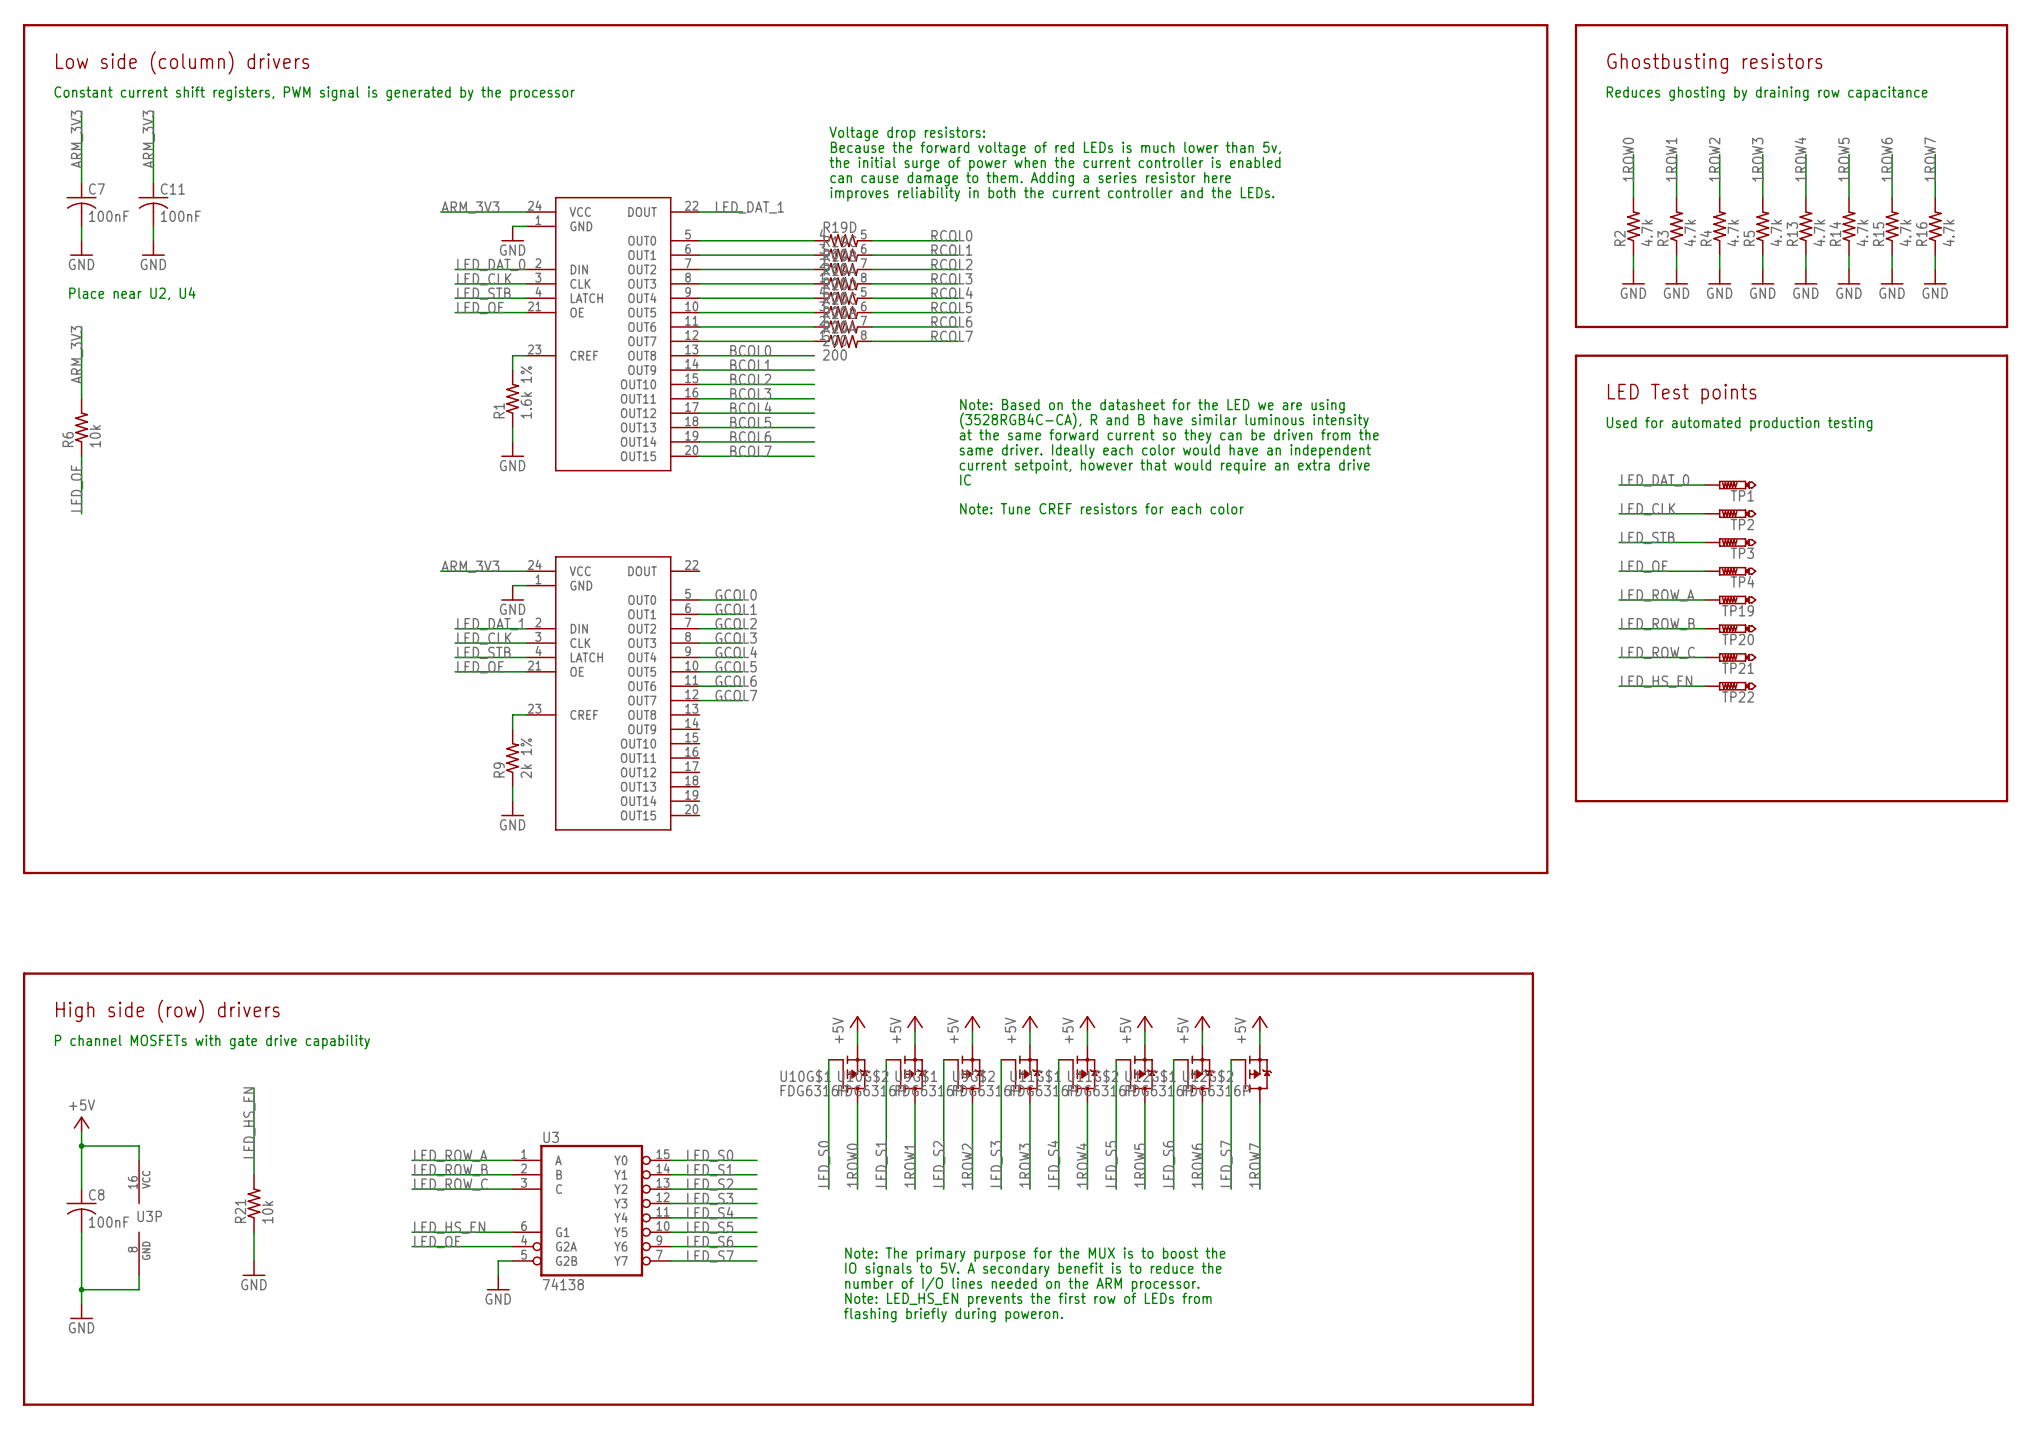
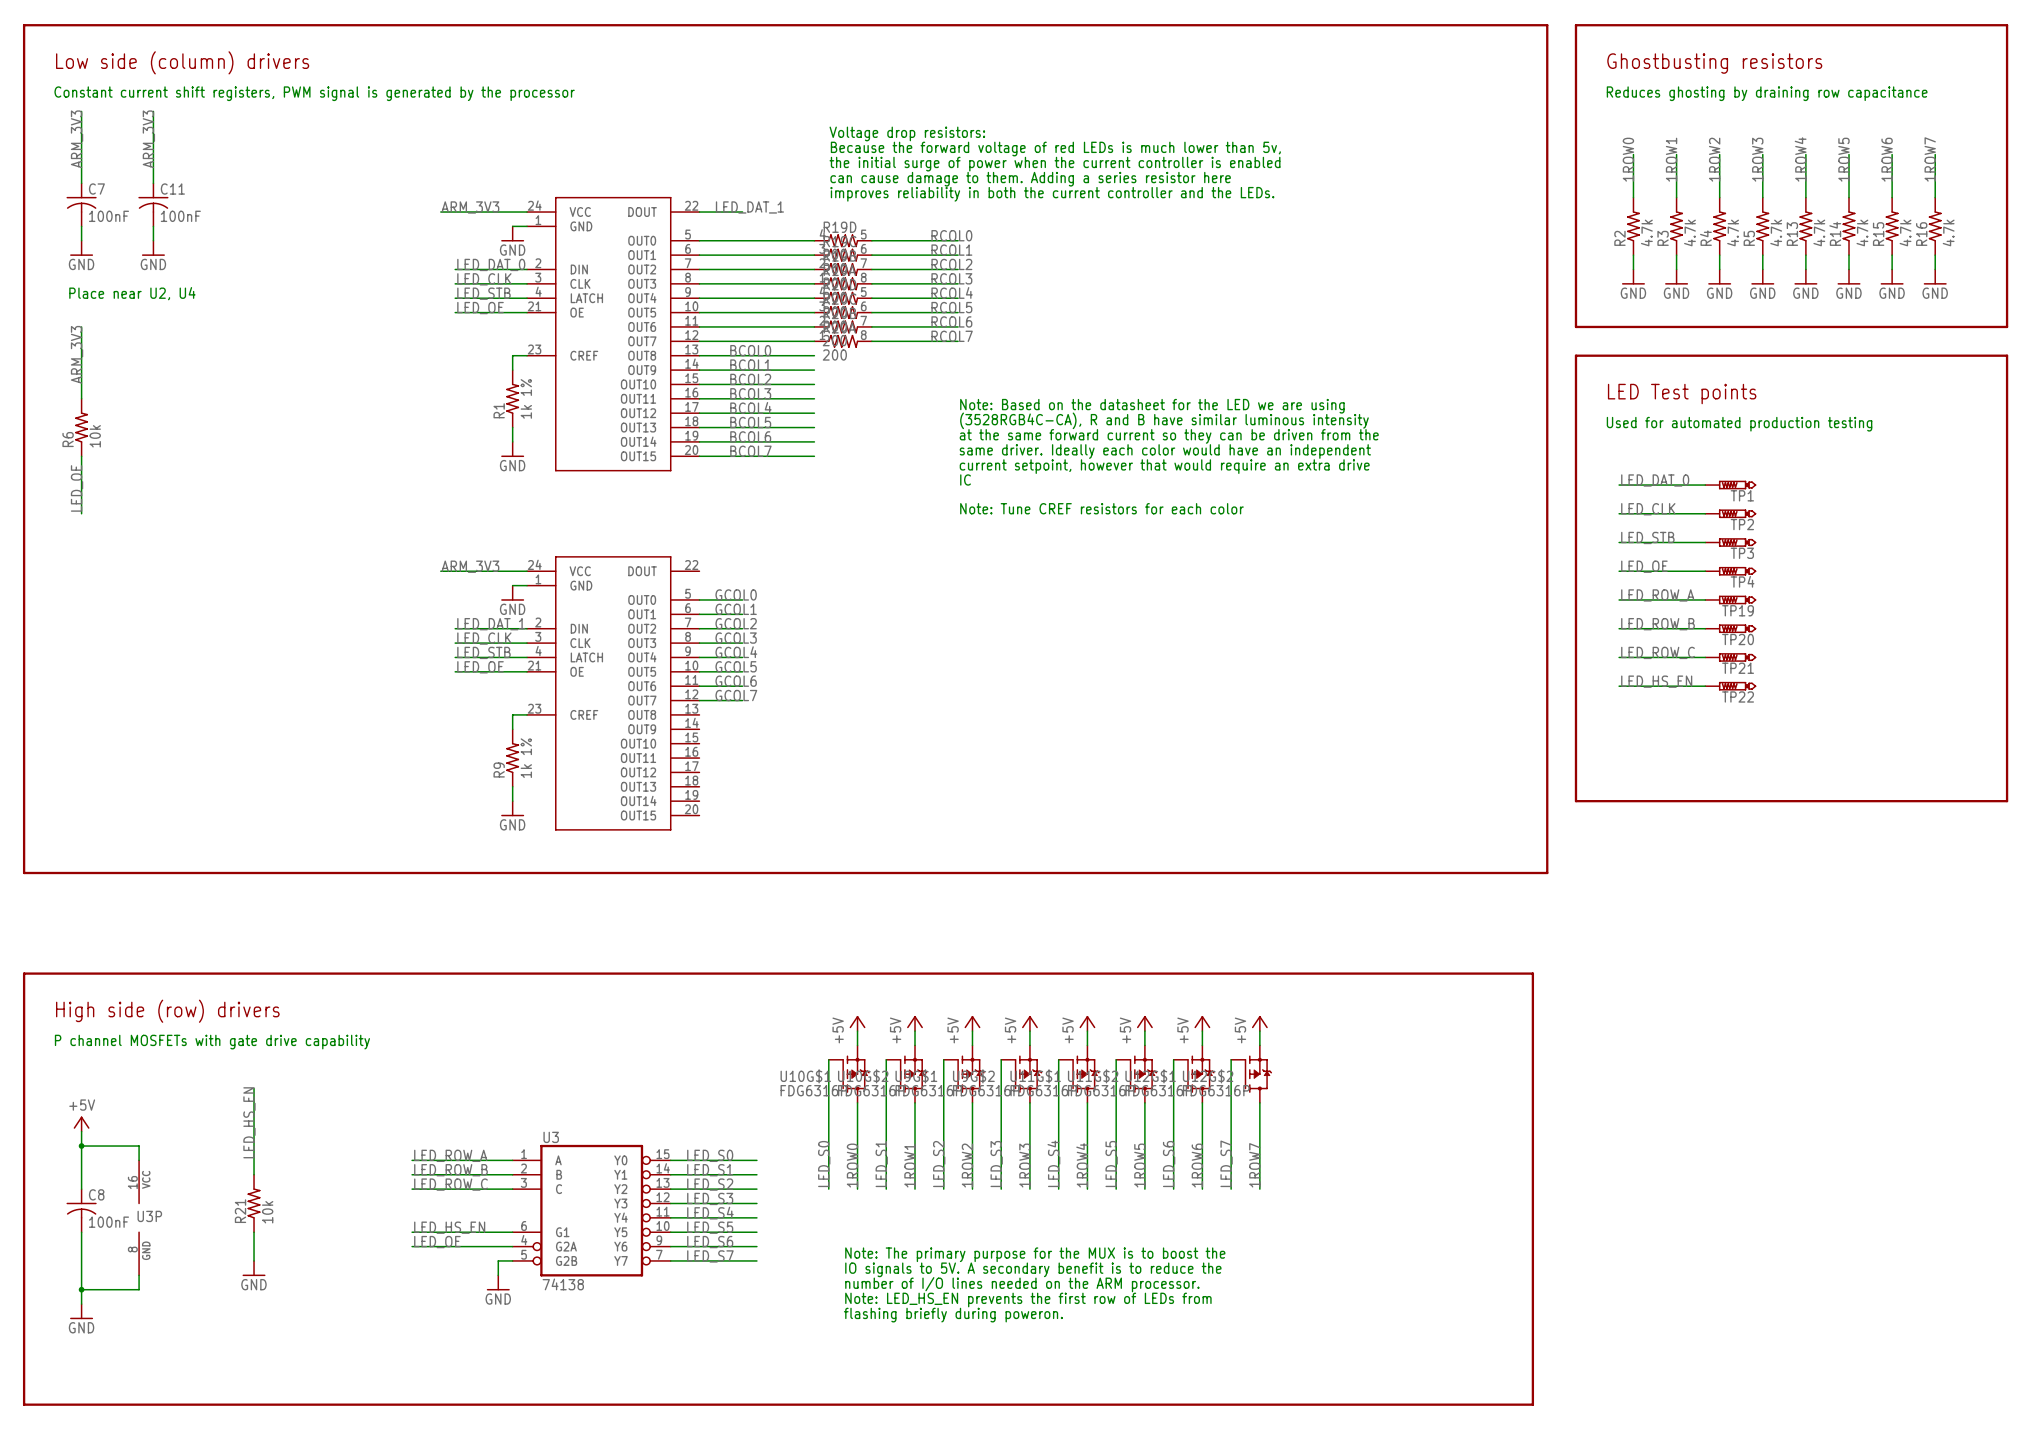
R1 value: 1.6k 1% (526, 392) -> 1k 1% (526, 398)
R9 value: 2k 1% (526, 758) -> 1k 1% (526, 758)

